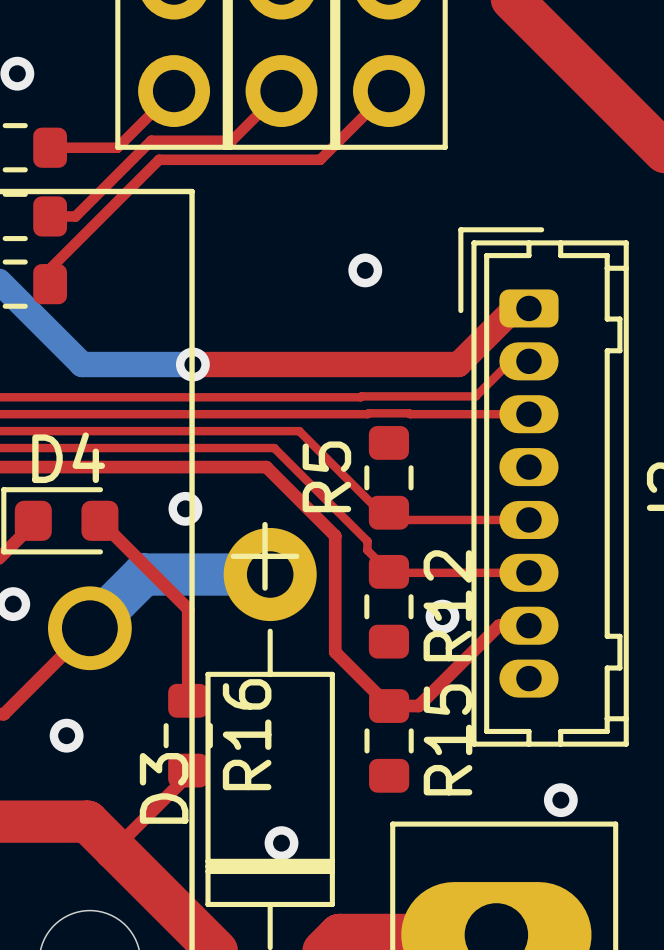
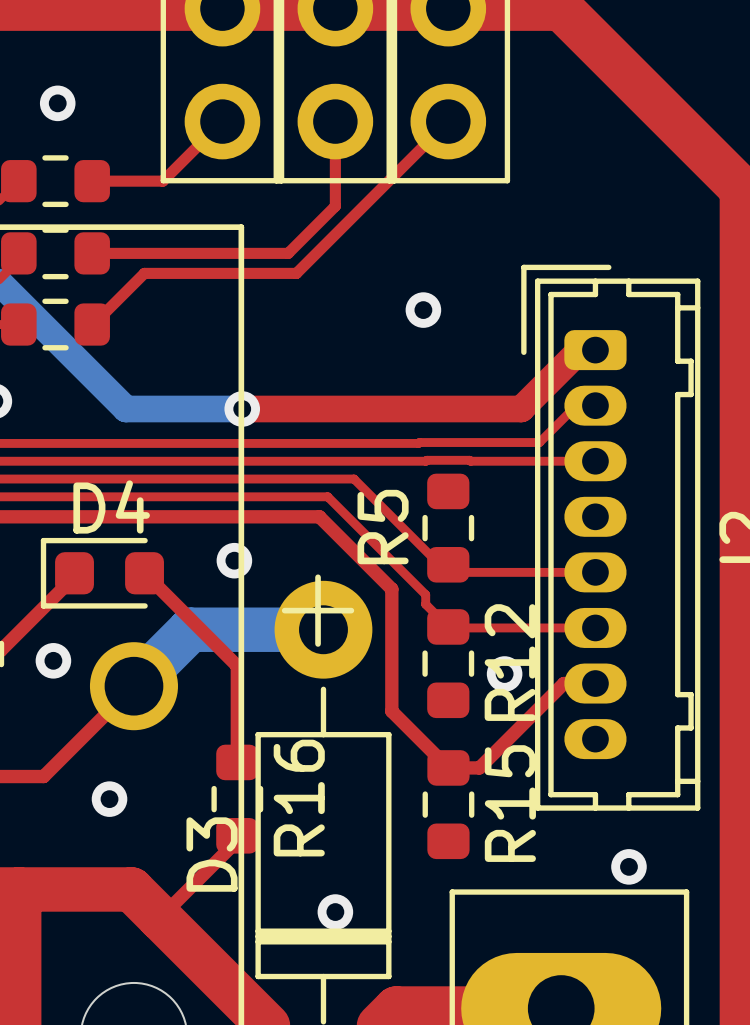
top track: (281, 91) (231, 140) (151, 140) (75, 216) -> (335, 121) (335, 206) (288, 253) (118, 253)
top track: (320, 159) (159, 159) (50, 268) (50, 284) -> (376, 193) (296, 273) (144, 273) (92, 324)

